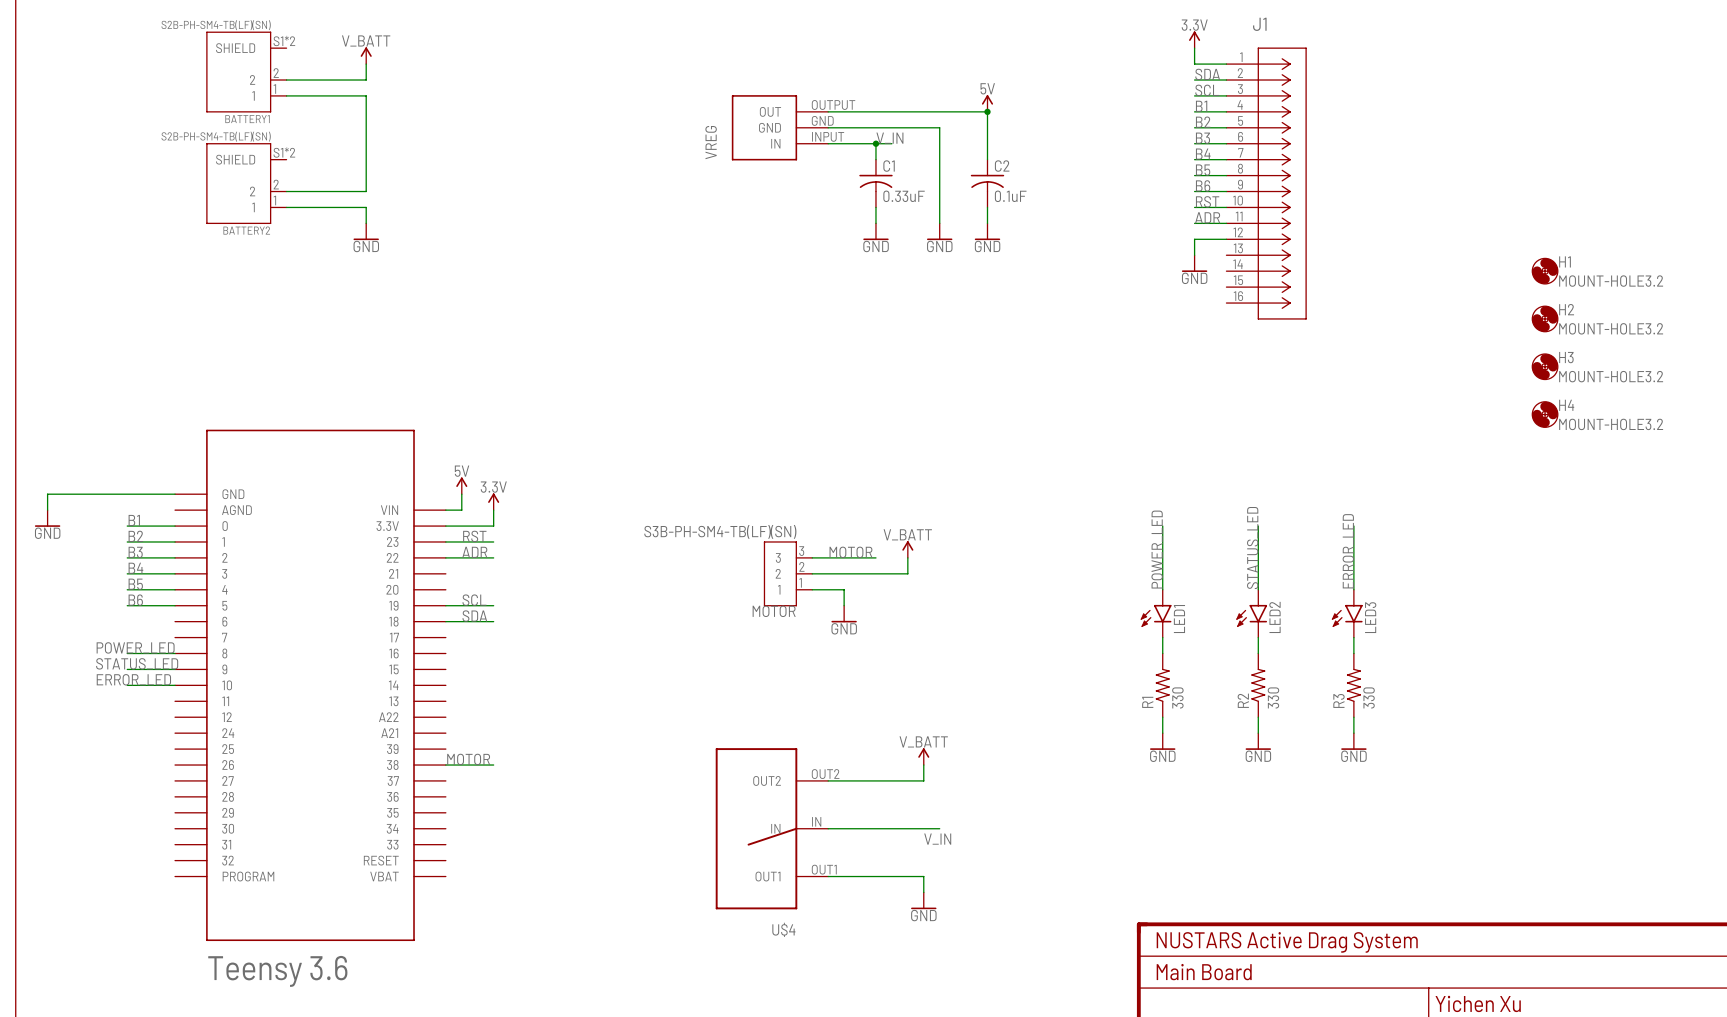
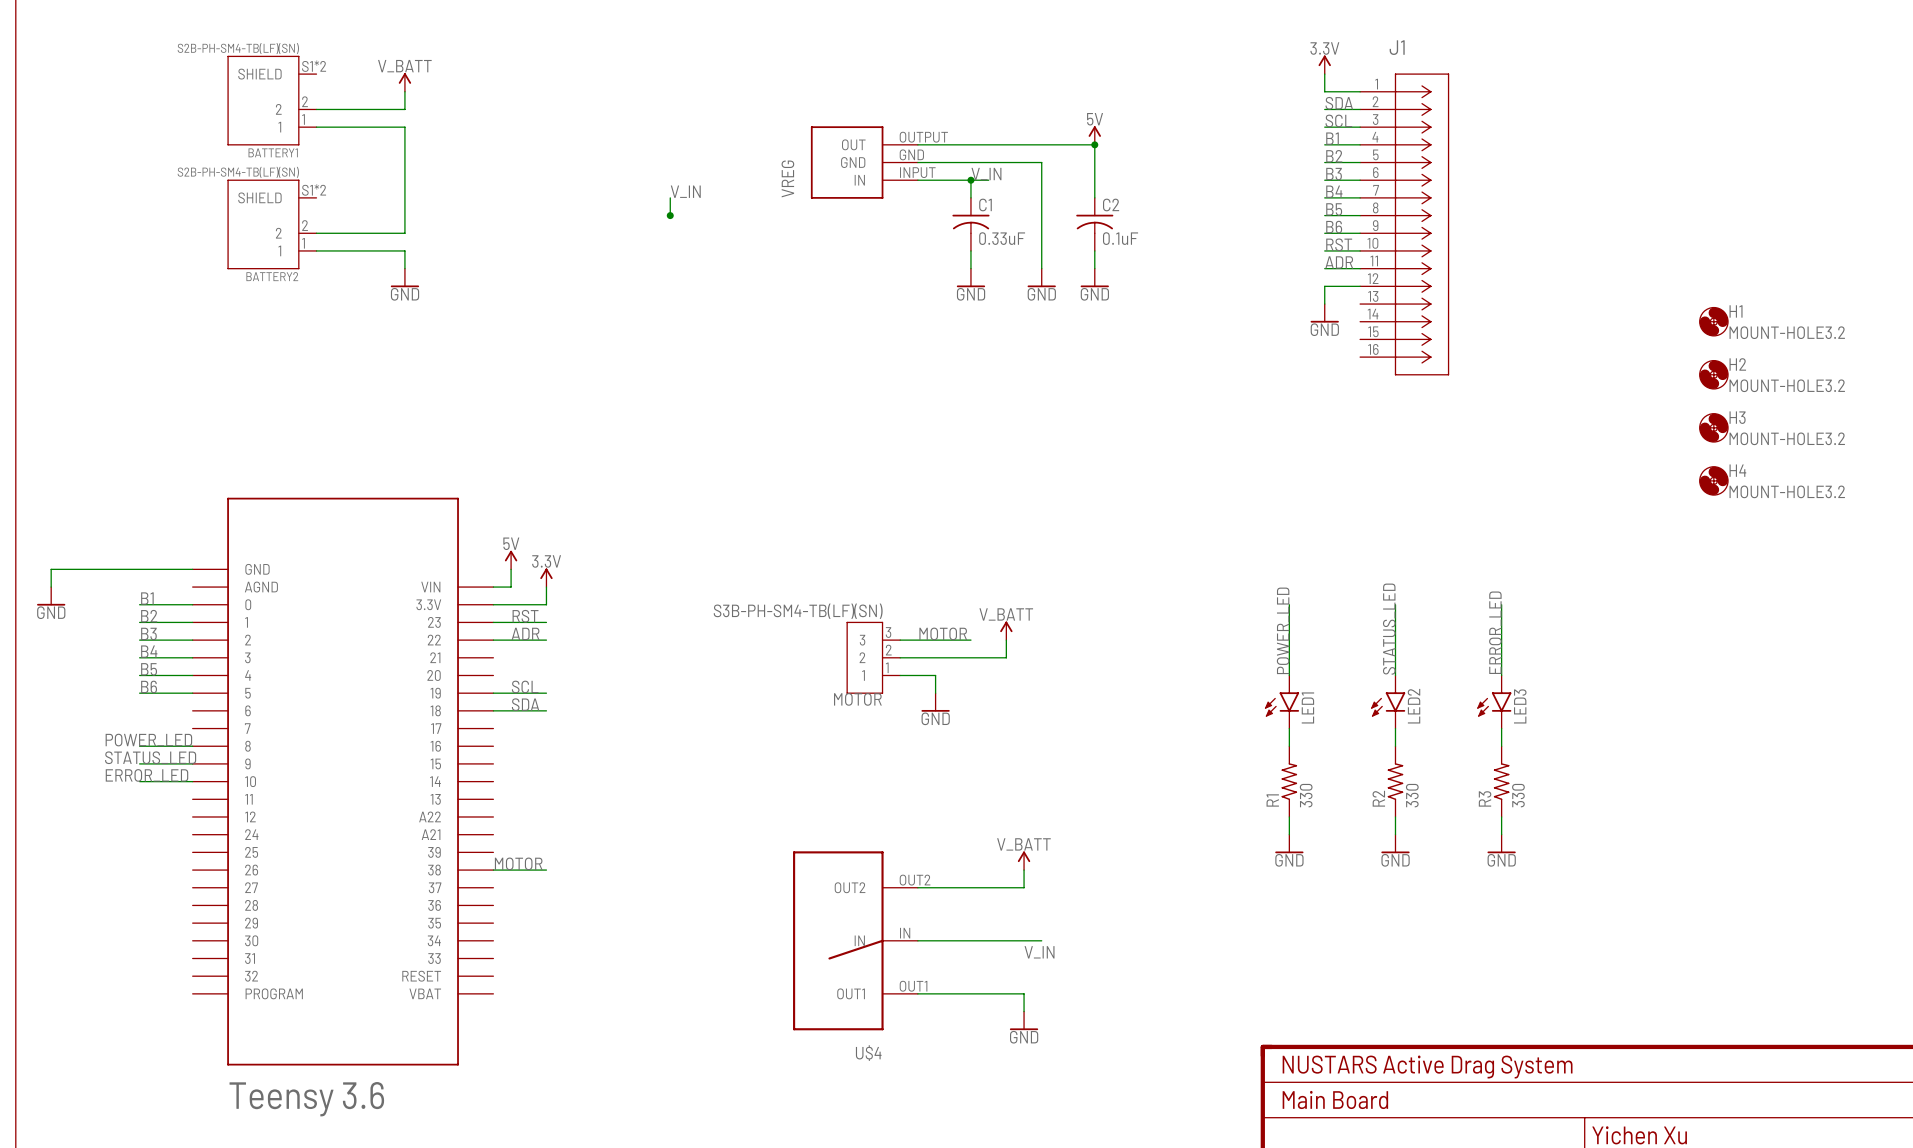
label: none -> V_IN (685, 191)
wire: none -> (670, 197) (670, 215)
junction: none -> (670, 215)

